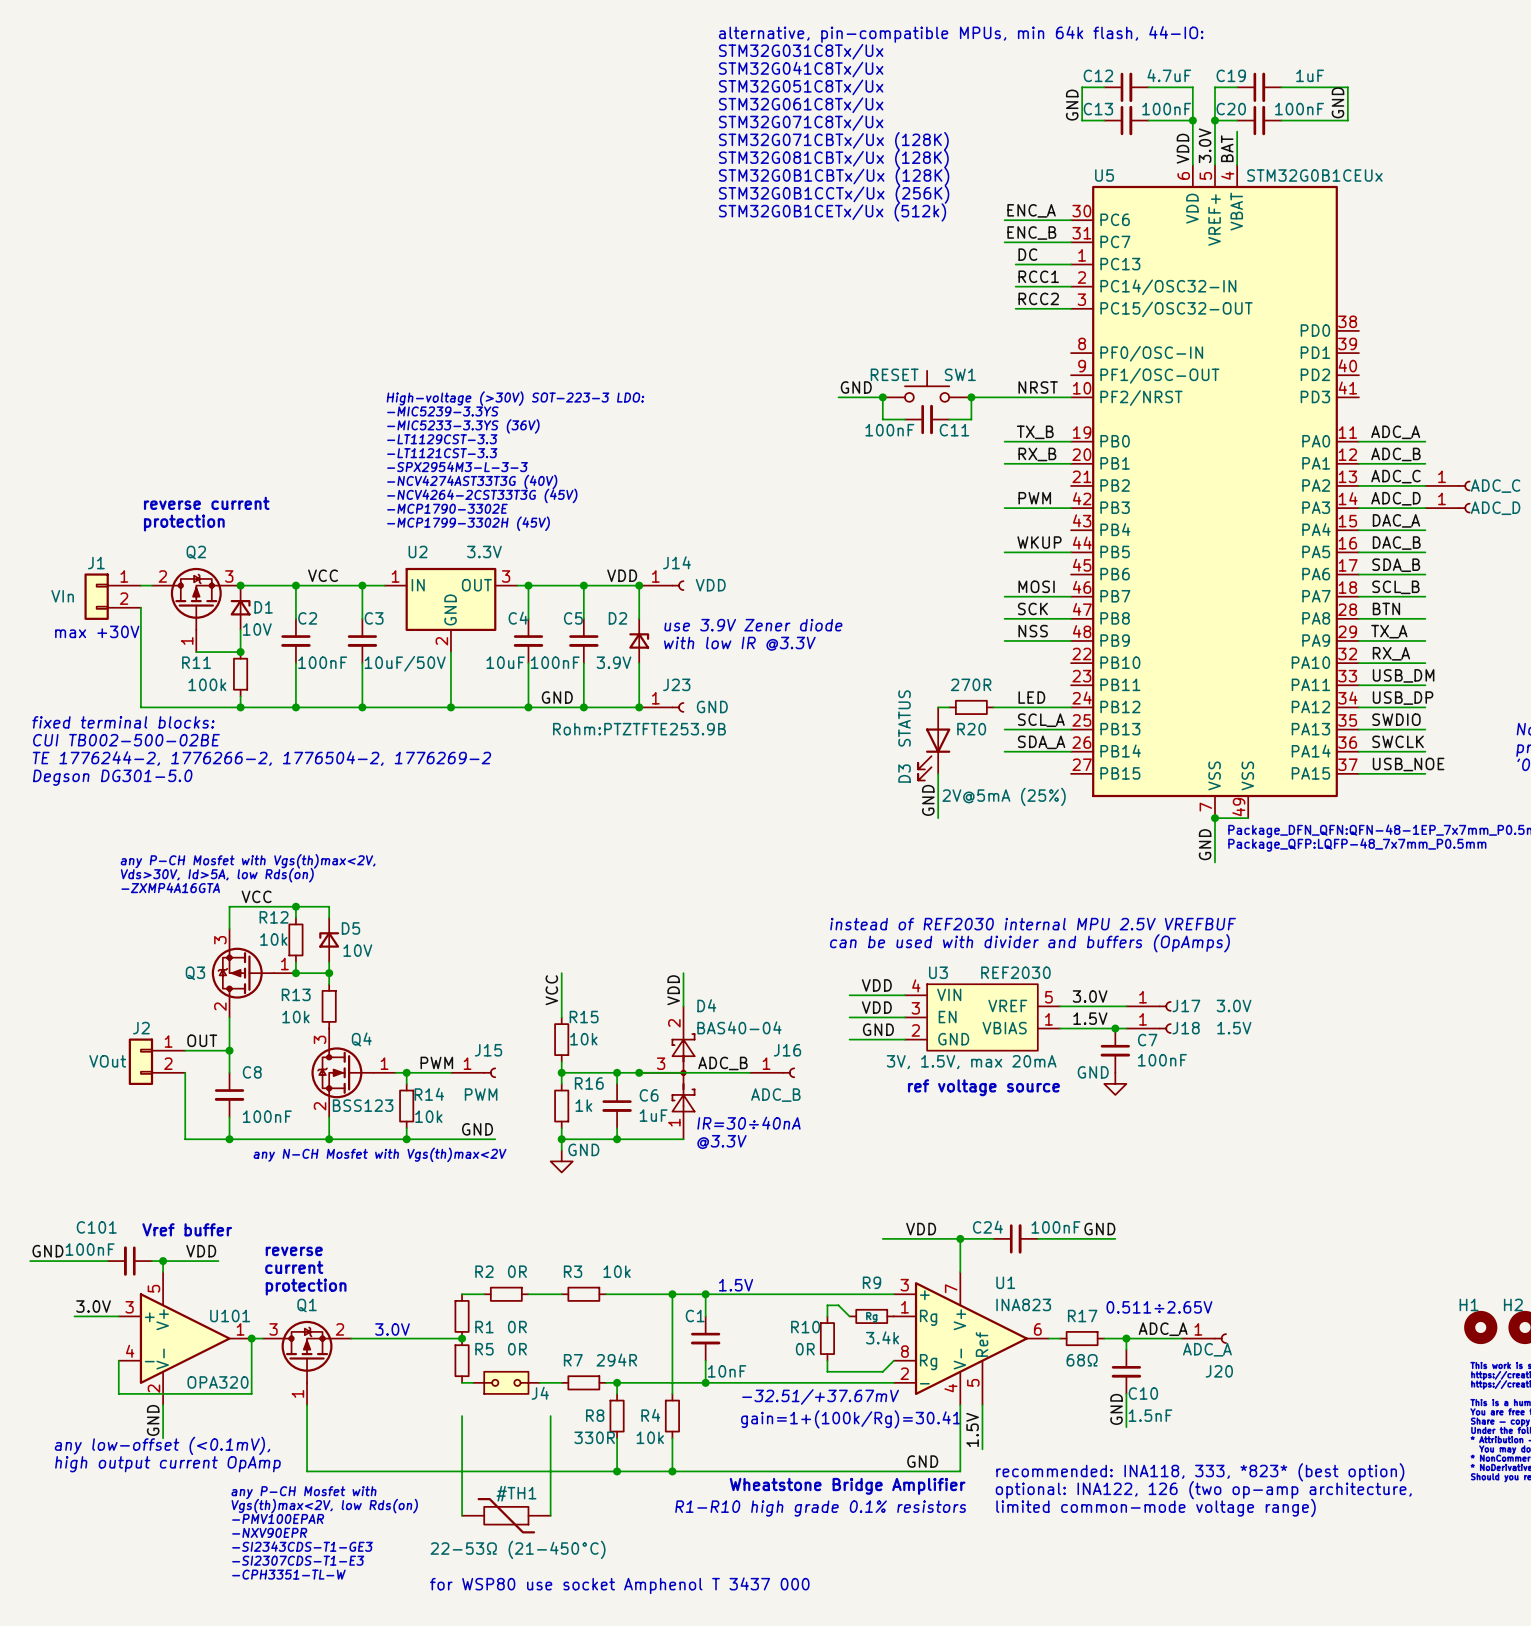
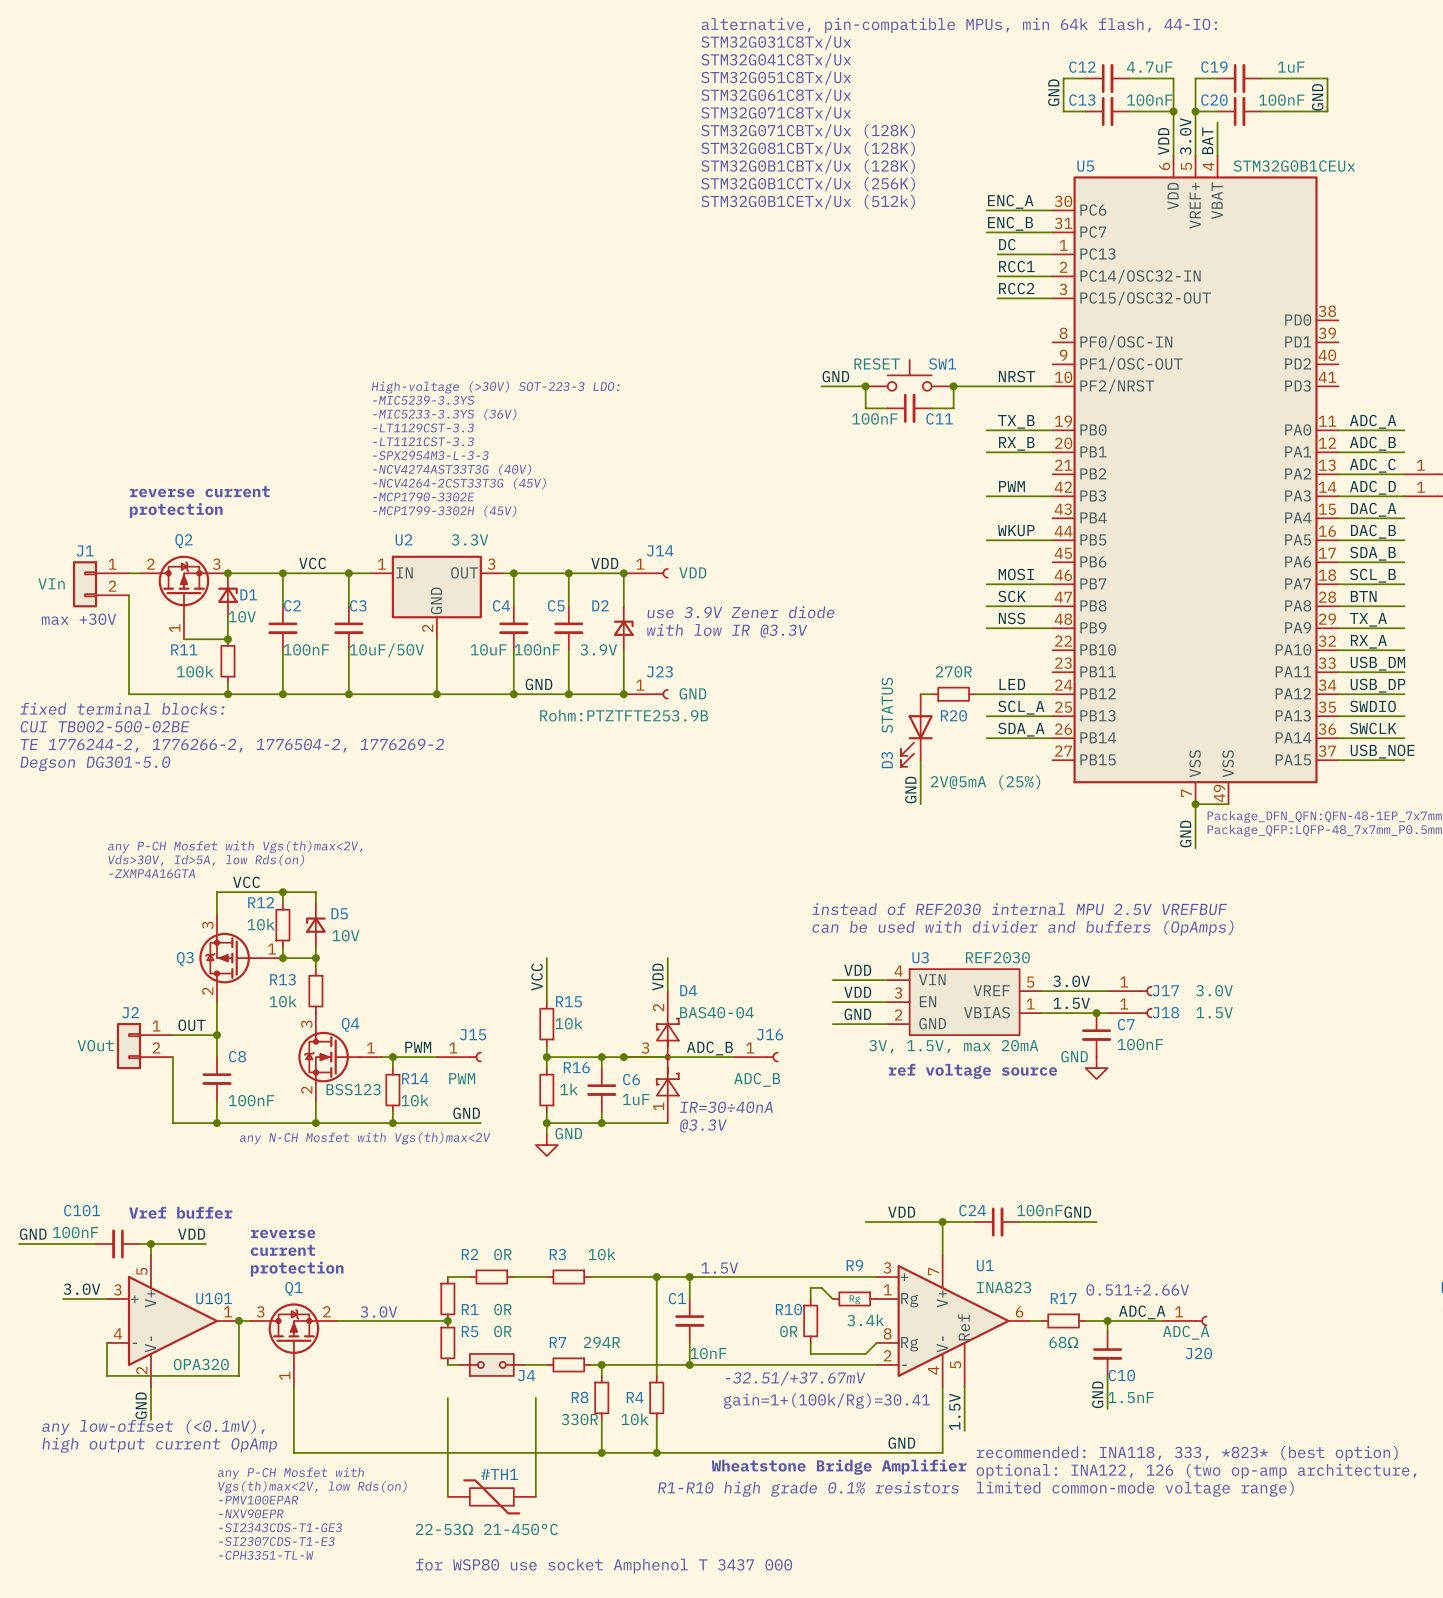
text: 0.511÷2.65V (1159, 1307) -> 0.511÷2.66V (1137, 1289)
power symbol: 22-53Ω (21-450°C) (506, 1515) -> 22-53Ω 21-450°C (491, 1496)

